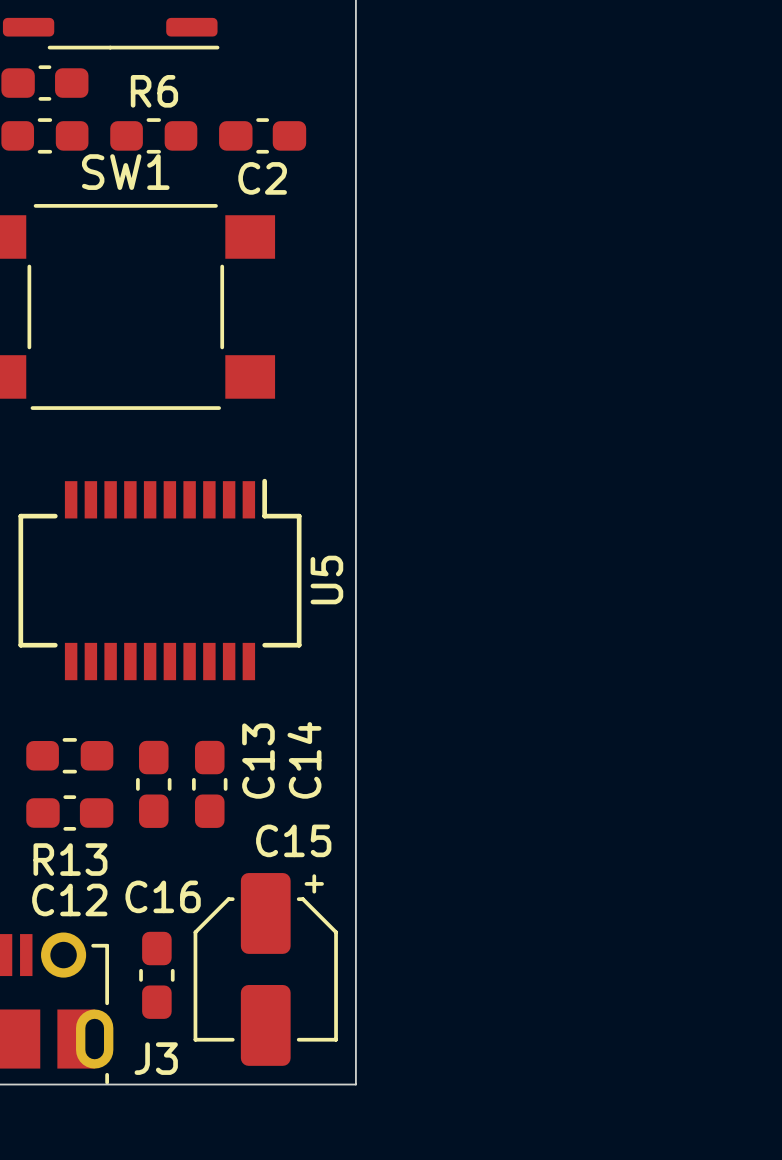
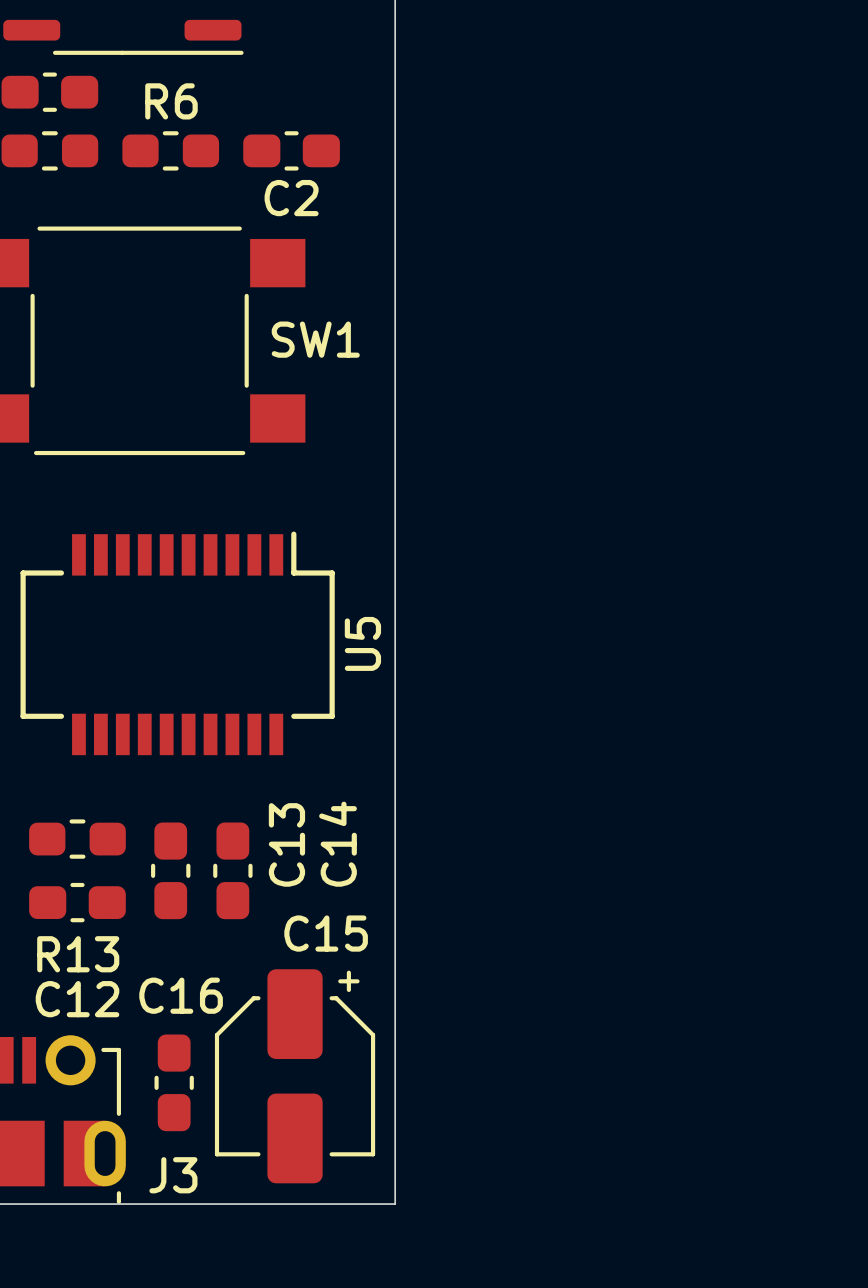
SW1 name position: SW1 (125, 172) -> SW1 (315, 339)

